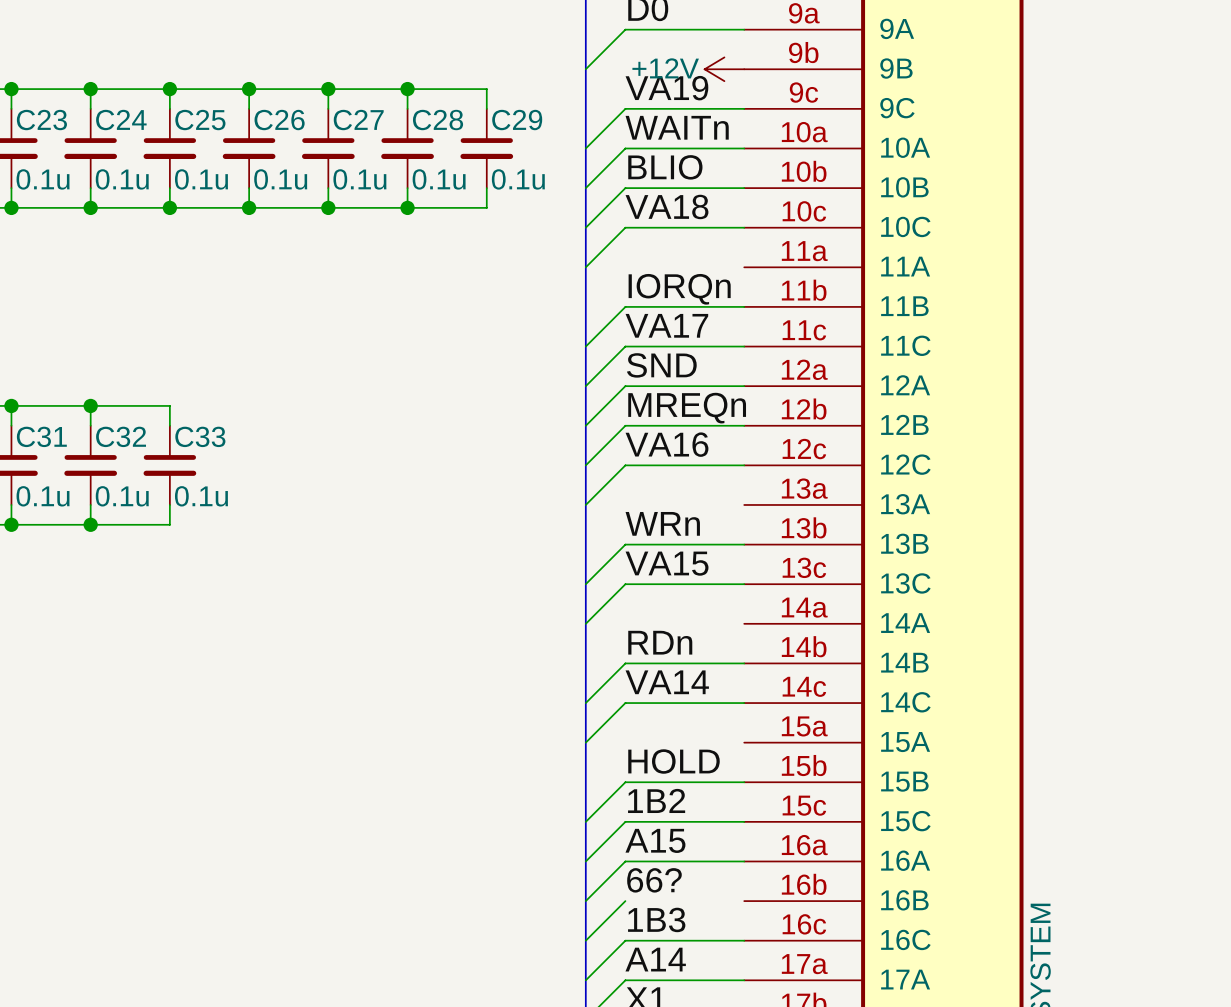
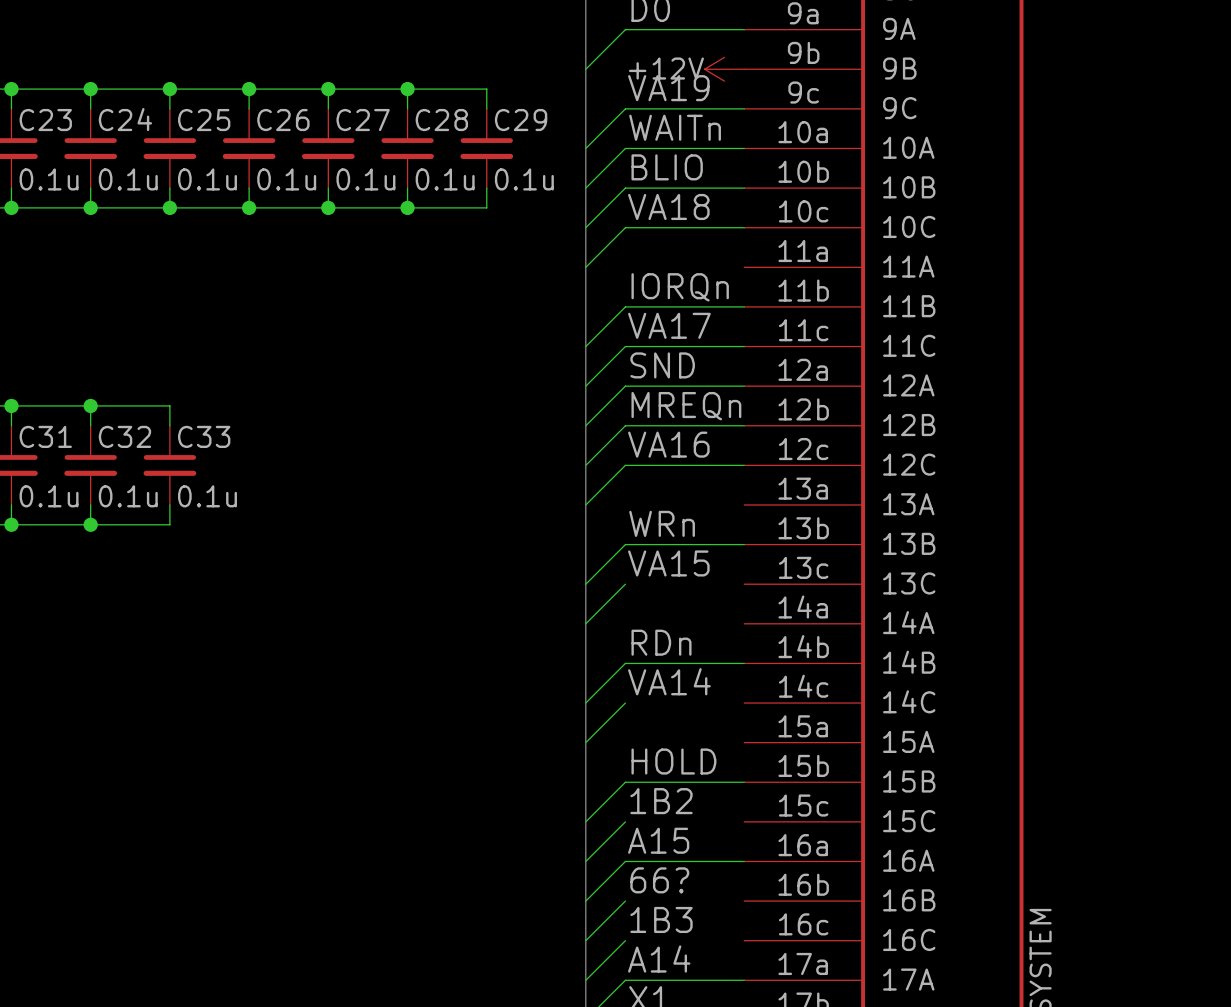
wire: (625, 584) (744, 584) -> none
wire: (625, 703) (744, 703) -> none
wire: (625, 821) (744, 821) -> none
wire: (625, 940) (744, 940) -> none

